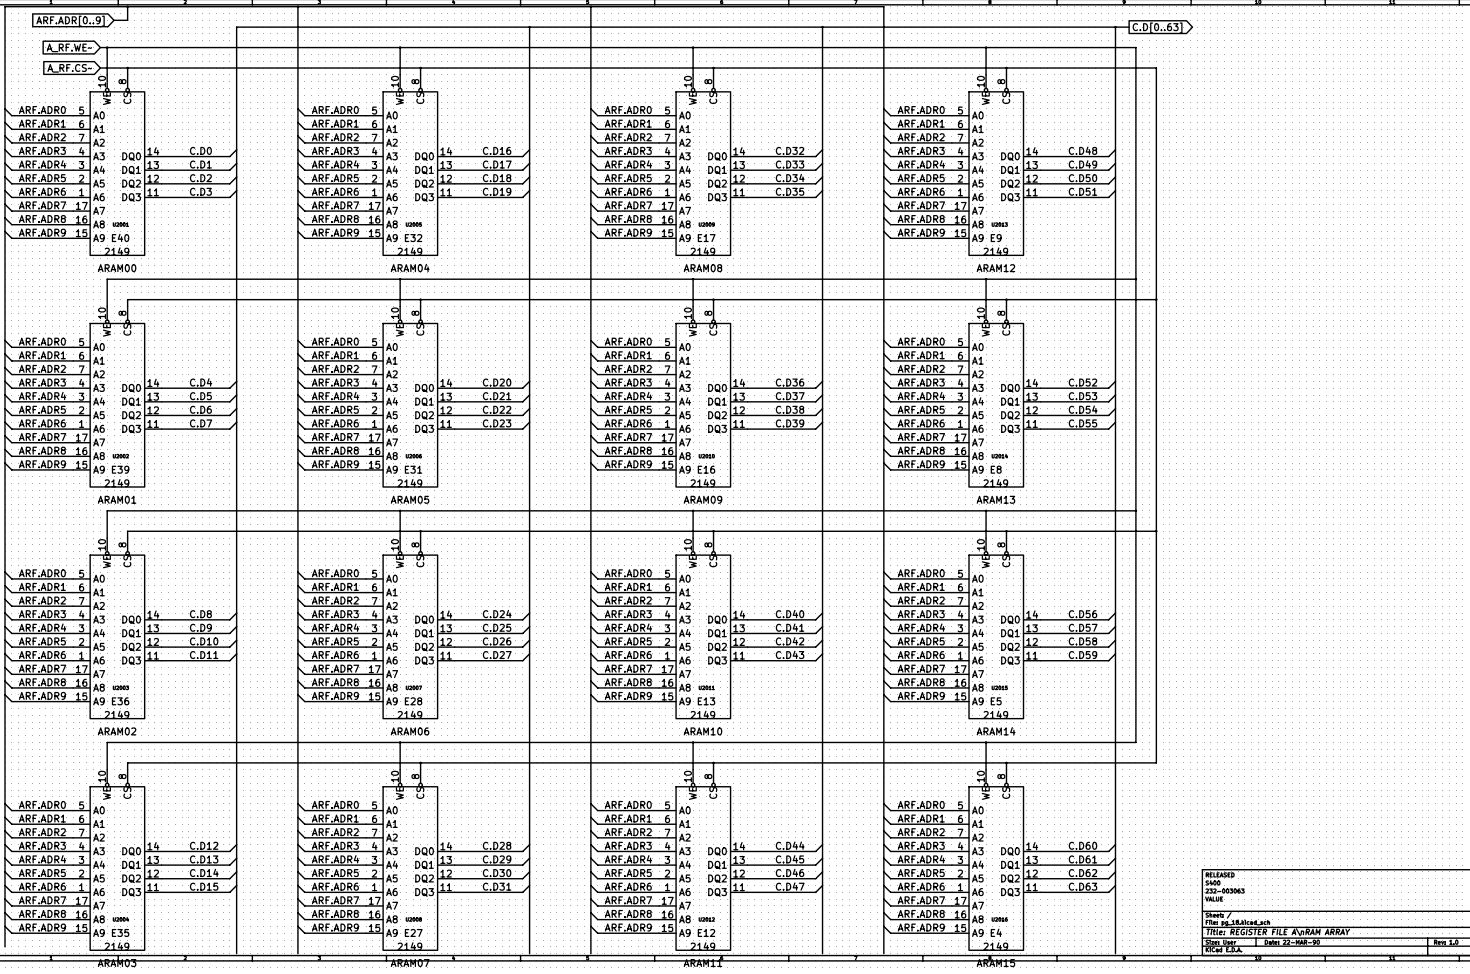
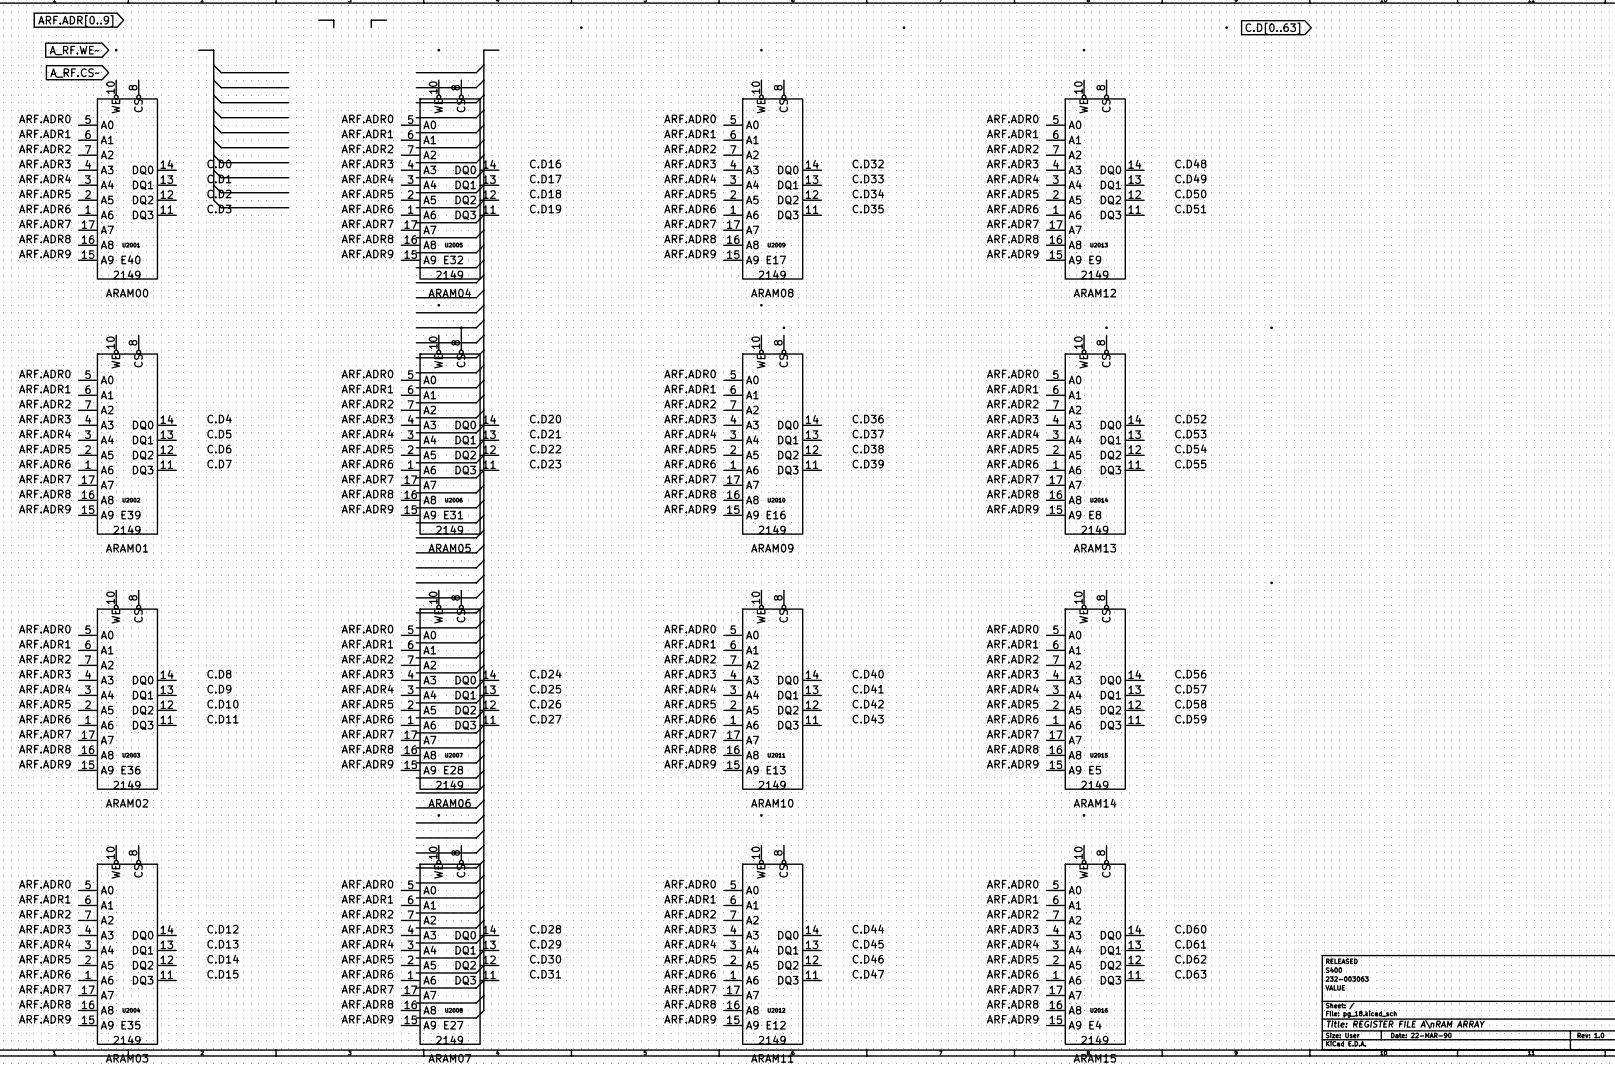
bus: (127, 6) (127, 20) (114, 20) -> none
bus: (297, 6) (297, 953) -> none
bus: (590, 6) (590, 953) -> none
wire: none -> (318, 20) (333, 20) (333, 27)
wire: none -> (386, 20) (371, 20) (371, 27)
bus: (529, 27) (529, 953) -> none
bus: (822, 27) (822, 953) -> none
bus: (1115, 27) (1115, 953) -> none
bus: (1129, 27) (236, 27) (236, 953) -> none
wire: (100, 47) (1135, 47) (1135, 742) (107, 742) (107, 769) -> none
wire: (107, 47) (107, 74) -> none
bus: none -> (198, 50) (213, 50) (213, 200)
wire: (400, 47) (400, 74) -> none
bus: none -> (498, 50) (483, 50) (483, 1010)
wire: (693, 47) (693, 74) -> none
wire: (986, 47) (986, 74) -> none
wire: none -> (483, 65) (476, 72)
wire: (100, 68) (202, 68) -> (213, 65) (221, 72)
wire: (127, 68) (127, 74) -> none
wire: (263, 68) (379, 68) -> none
wire: (420, 68) (420, 74) -> none
wire: (434, 68) (1156, 68) (1156, 762) (434, 762) -> (483, 830) (476, 837)
wire: (713, 68) (713, 74) -> none
wire: (1006, 68) (1006, 74) -> none
wire: none -> (213, 80) (221, 87) (288, 87)
wire: none -> (483, 80) (476, 87) (416, 87)
wire: none -> (213, 95) (221, 102) (288, 102)
wire: none -> (483, 95) (476, 102) (416, 102)
wire: none -> (213, 110) (221, 117) (288, 117)
wire: none -> (483, 110) (476, 117) (416, 117)
wire: (5, 108) (11, 115) (73, 115) -> none
wire: (297, 108) (304, 115) (366, 115) -> none
wire: (590, 108) (597, 115) (659, 115) -> none
wire: (883, 108) (890, 115) (951, 115) -> none
wire: none -> (213, 125) (221, 132) (288, 132)
wire: none -> (483, 125) (476, 132) (416, 132)
wire: (5, 122) (11, 129) (73, 129) -> none
wire: (297, 122) (304, 129) (366, 129) -> none
wire: (590, 122) (597, 129) (659, 129) -> none
wire: (883, 122) (890, 129) (951, 129) -> none
wire: none -> (213, 140) (221, 147) (288, 147)
wire: none -> (483, 140) (476, 147) (416, 147)
wire: (5, 136) (11, 142) (73, 142) -> none
wire: (297, 136) (304, 142) (366, 142) -> none
wire: (590, 136) (597, 142) (659, 142) -> none
wire: (883, 136) (890, 142) (951, 142) -> none
wire: none -> (213, 155) (221, 162) (288, 162)
wire: none -> (483, 155) (476, 162) (416, 162)
wire: (5, 149) (11, 156) (73, 156) -> none
wire: (236, 149) (229, 156) (161, 156) -> none
wire: (297, 149) (304, 156) (366, 156) -> none
wire: (529, 149) (522, 156) (454, 156) -> none
wire: (590, 149) (597, 156) (659, 156) -> none
wire: (822, 149) (815, 156) (747, 156) -> none
wire: (883, 149) (890, 156) (951, 156) -> none
wire: (1115, 149) (1108, 156) (1040, 156) -> none
wire: none -> (213, 170) (221, 177) (288, 177)
wire: none -> (483, 170) (476, 177) (416, 177)
wire: (5, 163) (11, 170) (73, 170) -> none
wire: (236, 163) (229, 170) (161, 170) -> none
wire: (297, 163) (304, 170) (366, 170) -> none
wire: (529, 163) (522, 170) (454, 170) -> none
wire: (590, 163) (597, 170) (659, 170) -> none
wire: (822, 163) (815, 170) (747, 170) -> none
wire: (883, 163) (890, 170) (951, 170) -> none
wire: (1115, 163) (1108, 170) (1040, 170) -> none
wire: none -> (213, 185) (221, 192) (288, 192)
wire: none -> (483, 185) (476, 192) (416, 192)
wire: (5, 177) (11, 183) (73, 183) -> none
wire: (236, 177) (229, 183) (161, 183) -> none
wire: (297, 177) (304, 183) (366, 183) -> none
wire: (529, 177) (522, 183) (454, 183) -> none
wire: (590, 177) (597, 183) (659, 183) -> none
wire: (822, 177) (815, 183) (747, 183) -> none
wire: (883, 177) (890, 183) (951, 183) -> none
wire: (1115, 177) (1108, 183) (1040, 183) -> none
wire: none -> (213, 200) (221, 207) (288, 207)
wire: none -> (483, 200) (476, 207) (416, 207)
wire: (5, 190) (11, 197) (73, 197) -> none
wire: (236, 190) (229, 197) (161, 197) -> none
wire: (297, 190) (304, 197) (366, 197) -> none
wire: (529, 190) (522, 197) (454, 197) -> none
wire: (590, 190) (597, 197) (659, 197) -> none
wire: (822, 190) (815, 197) (747, 197) -> none
wire: (883, 190) (890, 197) (951, 197) -> none
wire: (1115, 190) (1108, 197) (1040, 197) -> none
wire: none -> (483, 215) (476, 222) (416, 222)
wire: (5, 204) (11, 211) (73, 211) -> none
wire: (297, 204) (304, 211) (366, 211) -> none
wire: (590, 204) (597, 211) (659, 211) -> none
wire: (883, 204) (890, 211) (951, 211) -> none
wire: none -> (483, 230) (476, 237) (416, 237)
wire: (5, 217) (11, 224) (73, 224) -> none
wire: (297, 217) (304, 224) (366, 224) -> none
wire: (590, 217) (597, 224) (659, 224) -> none
wire: (883, 217) (890, 224) (951, 224) -> none
wire: none -> (483, 245) (476, 252) (416, 252)
wire: (5, 231) (11, 238) (73, 238) -> none
wire: (297, 231) (304, 238) (366, 238) -> none
wire: (590, 231) (597, 238) (659, 238) -> none
wire: (883, 231) (890, 238) (951, 238) -> none
wire: none -> (483, 260) (476, 267) (416, 267)
wire: none -> (483, 275) (476, 282) (416, 282)
wire: none -> (483, 290) (476, 297) (416, 297)
wire: (400, 279) (400, 306) -> none
wire: none -> (483, 305) (476, 312) (416, 312)
wire: (693, 279) (693, 306) -> none
wire: (986, 279) (986, 306) -> none
wire: (1135, 279) (107, 279) (107, 306) -> none
wire: (379, 299) (127, 299) (127, 306) -> none
wire: (434, 299) (1156, 299) -> (476, 327) (483, 320)
wire: (713, 299) (713, 306) -> none
wire: (1006, 299) (1006, 306) -> none
wire: none -> (483, 335) (476, 342) (416, 342)
wire: none -> (483, 350) (476, 357) (416, 357)
wire: none -> (483, 365) (476, 372) (416, 372)
wire: (5, 340) (11, 347) (73, 347) -> none
wire: (297, 340) (304, 347) (366, 347) -> none
wire: (590, 340) (597, 347) (659, 347) -> none
wire: (883, 340) (890, 347) (951, 347) -> none
wire: none -> (483, 380) (476, 387) (416, 387)
wire: (5, 354) (11, 360) (73, 360) -> none
wire: (297, 354) (304, 360) (366, 360) -> none
wire: (590, 354) (597, 360) (659, 360) -> none
wire: (883, 354) (890, 360) (951, 360) -> none
wire: none -> (483, 395) (476, 402) (416, 402)
wire: (5, 367) (11, 374) (73, 374) -> none
wire: (297, 367) (304, 374) (366, 374) -> none
wire: (590, 367) (597, 374) (659, 374) -> none
wire: (883, 367) (890, 374) (951, 374) -> none
wire: none -> (483, 410) (476, 417) (416, 417)
wire: (5, 381) (11, 388) (73, 388) -> none
wire: (236, 381) (229, 388) (161, 388) -> none
wire: (297, 381) (304, 388) (366, 388) -> none
wire: (529, 381) (522, 388) (454, 388) -> none
wire: (590, 381) (597, 388) (659, 388) -> none
wire: (822, 381) (815, 388) (747, 388) -> none
wire: (883, 381) (890, 388) (951, 388) -> none
wire: (1115, 381) (1108, 388) (1040, 388) -> none
wire: none -> (483, 425) (476, 432) (416, 432)
wire: (5, 395) (11, 401) (73, 401) -> none
wire: (236, 395) (229, 401) (161, 401) -> none
wire: (297, 395) (304, 401) (366, 401) -> none
wire: (529, 395) (522, 401) (454, 401) -> none
wire: (590, 395) (597, 401) (659, 401) -> none
wire: (822, 395) (815, 401) (747, 401) -> none
wire: (883, 395) (890, 401) (951, 401) -> none
wire: (1115, 395) (1108, 401) (1040, 401) -> none
wire: none -> (483, 440) (476, 447) (416, 447)
wire: (5, 408) (11, 415) (73, 415) -> none
wire: (236, 408) (229, 415) (161, 415) -> none
wire: (297, 408) (304, 415) (366, 415) -> none
wire: (529, 408) (522, 415) (454, 415) -> none
wire: (590, 408) (597, 415) (659, 415) -> none
wire: (822, 408) (815, 415) (747, 415) -> none
wire: (883, 408) (890, 415) (951, 415) -> none
wire: (1115, 408) (1108, 415) (1040, 415) -> none
wire: none -> (483, 455) (476, 462) (416, 462)
wire: (5, 422) (11, 429) (73, 429) -> none
wire: (236, 422) (229, 429) (161, 429) -> none
wire: (297, 422) (304, 429) (366, 429) -> none
wire: (529, 422) (522, 429) (454, 429) -> none
wire: (590, 422) (597, 429) (659, 429) -> none
wire: (822, 422) (815, 429) (747, 429) -> none
wire: (883, 422) (890, 429) (951, 429) -> none
wire: (1115, 422) (1108, 429) (1040, 429) -> none
wire: none -> (483, 470) (476, 477) (416, 477)
wire: (5, 435) (11, 442) (73, 442) -> none
wire: (297, 435) (304, 442) (366, 442) -> none
wire: (590, 435) (597, 442) (659, 442) -> none
wire: (883, 435) (890, 442) (951, 442) -> none
wire: none -> (483, 485) (476, 492) (416, 492)
wire: (5, 449) (11, 456) (73, 456) -> none
wire: (297, 449) (304, 456) (366, 456) -> none
wire: (590, 449) (597, 456) (659, 456) -> none
wire: (883, 449) (890, 456) (951, 456) -> none
wire: none -> (483, 500) (476, 507) (416, 507)
wire: (5, 463) (11, 469) (73, 469) -> none
wire: (297, 463) (304, 469) (366, 469) -> none
wire: (590, 463) (597, 469) (659, 469) -> none
wire: (883, 463) (890, 469) (951, 469) -> none
wire: none -> (483, 515) (476, 522) (416, 522)
wire: none -> (483, 530) (476, 537) (416, 537)
wire: none -> (483, 545) (476, 552) (416, 552)
wire: (400, 510) (400, 538) -> none
wire: none -> (483, 560) (476, 567) (416, 567)
wire: (693, 510) (693, 538) -> none
wire: (986, 510) (986, 538) -> none
wire: (1135, 510) (107, 510) (107, 538) -> none
wire: (379, 531) (127, 531) (127, 538) -> none
wire: (420, 531) (420, 538) -> none
wire: (434, 531) (1156, 531) -> (476, 582) (483, 575)
wire: (713, 531) (713, 538) -> none
wire: (1006, 531) (1006, 538) -> none
wire: none -> (483, 590) (476, 597) (416, 597)
wire: none -> (483, 605) (476, 612) (416, 612)
wire: none -> (483, 620) (476, 627) (416, 627)
wire: (5, 572) (11, 578) (73, 578) -> none
wire: (297, 572) (304, 578) (366, 578) -> none
wire: (590, 572) (597, 578) (659, 578) -> none
wire: (883, 572) (890, 578) (951, 578) -> none
wire: none -> (483, 635) (476, 642) (416, 642)
wire: (5, 585) (11, 592) (73, 592) -> none
wire: (297, 585) (304, 592) (366, 592) -> none
wire: (590, 585) (597, 592) (659, 592) -> none
wire: (883, 585) (890, 592) (951, 592) -> none
wire: none -> (483, 650) (476, 657) (416, 657)
wire: (5, 599) (11, 606) (73, 606) -> none
wire: (297, 599) (304, 606) (366, 606) -> none
wire: (590, 599) (597, 606) (659, 606) -> none
wire: (883, 599) (890, 606) (951, 606) -> none
wire: none -> (483, 665) (476, 672) (416, 672)
wire: (5, 613) (11, 619) (73, 619) -> none
wire: (236, 613) (229, 619) (161, 619) -> none
wire: (297, 613) (304, 619) (366, 619) -> none
wire: (529, 613) (522, 619) (454, 619) -> none
wire: (590, 613) (597, 619) (659, 619) -> none
wire: (822, 613) (815, 619) (747, 619) -> none
wire: (883, 613) (890, 619) (951, 619) -> none
wire: (1115, 613) (1108, 619) (1040, 619) -> none
wire: none -> (483, 680) (476, 687) (416, 687)
wire: (5, 626) (11, 633) (73, 633) -> none
wire: (236, 626) (229, 633) (161, 633) -> none
wire: (297, 626) (304, 633) (366, 633) -> none
wire: (529, 626) (522, 633) (454, 633) -> none
wire: (590, 626) (597, 633) (659, 633) -> none
wire: (822, 626) (815, 633) (747, 633) -> none
wire: (883, 626) (890, 633) (951, 633) -> none
wire: (1115, 626) (1108, 633) (1040, 633) -> none
wire: none -> (483, 695) (476, 702) (416, 702)
wire: (5, 640) (11, 647) (73, 647) -> none
wire: (236, 640) (229, 647) (161, 647) -> none
wire: (297, 640) (304, 647) (366, 647) -> none
wire: (529, 640) (522, 647) (454, 647) -> none
wire: (590, 640) (597, 647) (659, 647) -> none
wire: (822, 640) (815, 647) (747, 647) -> none
wire: (883, 640) (890, 647) (951, 647) -> none
wire: (1115, 640) (1108, 647) (1040, 647) -> none
wire: none -> (483, 710) (476, 717) (416, 717)
wire: (5, 653) (11, 660) (73, 660) -> none
wire: (236, 653) (229, 660) (161, 660) -> none
wire: (297, 653) (304, 660) (366, 660) -> none
wire: (529, 653) (522, 660) (454, 660) -> none
wire: (590, 653) (597, 660) (659, 660) -> none
wire: (822, 653) (815, 660) (747, 660) -> none
wire: (883, 653) (890, 660) (951, 660) -> none
wire: (1115, 653) (1108, 660) (1040, 660) -> none
wire: none -> (483, 725) (476, 732) (416, 732)
wire: (5, 667) (11, 674) (73, 674) -> none
wire: (297, 667) (304, 674) (366, 674) -> none
wire: (590, 667) (597, 674) (659, 674) -> none
wire: (883, 667) (890, 674) (951, 674) -> none
wire: none -> (483, 740) (476, 747) (416, 747)
wire: (5, 681) (11, 687) (73, 687) -> none
wire: (297, 681) (304, 687) (366, 687) -> none
wire: (590, 681) (597, 687) (659, 687) -> none
wire: (883, 681) (890, 687) (951, 687) -> none
wire: none -> (483, 755) (476, 762) (416, 762)
wire: (5, 694) (11, 701) (73, 701) -> none
wire: (297, 694) (304, 701) (366, 701) -> none
wire: (590, 694) (597, 701) (659, 701) -> none
wire: (883, 694) (890, 701) (951, 701) -> none
wire: none -> (483, 770) (476, 777) (416, 777)
wire: none -> (483, 785) (476, 792) (416, 792)
wire: none -> (483, 800) (476, 807) (416, 807)
wire: (400, 742) (400, 769) -> none
wire: none -> (483, 815) (476, 822) (416, 822)
wire: (693, 742) (693, 769) -> none
wire: (986, 742) (986, 769) -> none
wire: (379, 762) (127, 762) (127, 769) -> none
wire: (420, 762) (420, 769) -> none
wire: (713, 762) (713, 769) -> none
wire: (1006, 762) (1006, 769) -> none
wire: none -> (483, 845) (476, 852) (416, 852)
wire: none -> (483, 860) (476, 867) (416, 867)
wire: none -> (483, 875) (476, 882) (416, 882)
wire: (5, 803) (11, 810) (73, 810) -> none
wire: (297, 803) (304, 810) (366, 810) -> none
wire: (590, 803) (597, 810) (659, 810) -> none
wire: (883, 803) (890, 810) (951, 810) -> none
wire: none -> (483, 890) (476, 897) (416, 897)
wire: (5, 817) (11, 824) (73, 824) -> none
wire: (297, 817) (304, 824) (366, 824) -> none
wire: (590, 817) (597, 824) (659, 824) -> none
wire: (883, 817) (890, 824) (951, 824) -> none
wire: none -> (483, 905) (476, 912) (416, 912)
wire: (5, 831) (11, 837) (73, 837) -> none
wire: (297, 831) (304, 837) (366, 837) -> none
wire: (590, 831) (597, 837) (659, 837) -> none
wire: (883, 831) (890, 837) (951, 837) -> none
wire: none -> (483, 920) (476, 927) (416, 927)
wire: (5, 844) (11, 851) (73, 851) -> none
wire: (236, 844) (229, 851) (161, 851) -> none
wire: (297, 844) (304, 851) (366, 851) -> none
wire: (529, 844) (522, 851) (454, 851) -> none
wire: (590, 844) (597, 851) (659, 851) -> none
wire: (822, 844) (815, 851) (747, 851) -> none
wire: (883, 844) (890, 851) (951, 851) -> none
wire: (1115, 844) (1108, 851) (1040, 851) -> none
wire: none -> (483, 935) (476, 942) (416, 942)
wire: (5, 858) (11, 865) (73, 865) -> none
wire: (236, 858) (229, 865) (161, 865) -> none
wire: (297, 858) (304, 865) (366, 865) -> none
wire: (529, 858) (522, 865) (454, 865) -> none
wire: (590, 858) (597, 865) (659, 865) -> none
wire: (822, 858) (815, 865) (747, 865) -> none
wire: (883, 858) (890, 865) (951, 865) -> none
wire: (1115, 858) (1108, 865) (1040, 865) -> none
wire: none -> (483, 950) (476, 957) (416, 957)
wire: (5, 871) (11, 878) (73, 878) -> none
wire: (236, 871) (229, 878) (161, 878) -> none
wire: (297, 871) (304, 878) (366, 878) -> none
wire: (529, 871) (522, 878) (454, 878) -> none
wire: (590, 871) (597, 878) (659, 878) -> none
wire: (822, 871) (815, 878) (747, 878) -> none
wire: (883, 871) (890, 878) (951, 878) -> none
wire: (1115, 871) (1108, 878) (1040, 878) -> none
wire: none -> (483, 965) (476, 972) (416, 972)
wire: (5, 885) (11, 892) (73, 892) -> none
wire: (236, 885) (229, 892) (161, 892) -> none
wire: (297, 885) (304, 892) (366, 892) -> none
wire: (529, 885) (522, 892) (454, 892) -> none
wire: (590, 885) (597, 892) (659, 892) -> none
wire: (822, 885) (815, 892) (747, 892) -> none
wire: (883, 885) (890, 892) (951, 892) -> none
wire: (1115, 885) (1108, 892) (1040, 892) -> none
wire: none -> (483, 980) (476, 988) (416, 988)
wire: (5, 899) (11, 905) (73, 905) -> none
wire: (297, 899) (304, 905) (366, 905) -> none
wire: (590, 899) (597, 905) (659, 905) -> none
wire: (883, 899) (890, 905) (951, 905) -> none
wire: none -> (483, 995) (476, 1003) (416, 1003)
wire: (5, 912) (11, 919) (73, 919) -> none
wire: (297, 912) (304, 919) (366, 919) -> none
wire: (590, 912) (597, 919) (659, 919) -> none
wire: (883, 912) (890, 919) (951, 919) -> none
wire: none -> (483, 1010) (476, 1018) (416, 1018)
wire: (5, 926) (11, 933) (73, 933) -> none
wire: (297, 926) (304, 933) (366, 933) -> none
wire: (590, 926) (597, 933) (659, 933) -> none
wire: (883, 926) (890, 933) (951, 933) -> none
bus: (5, 946) (5, 6) (883, 6) (883, 953) -> none

